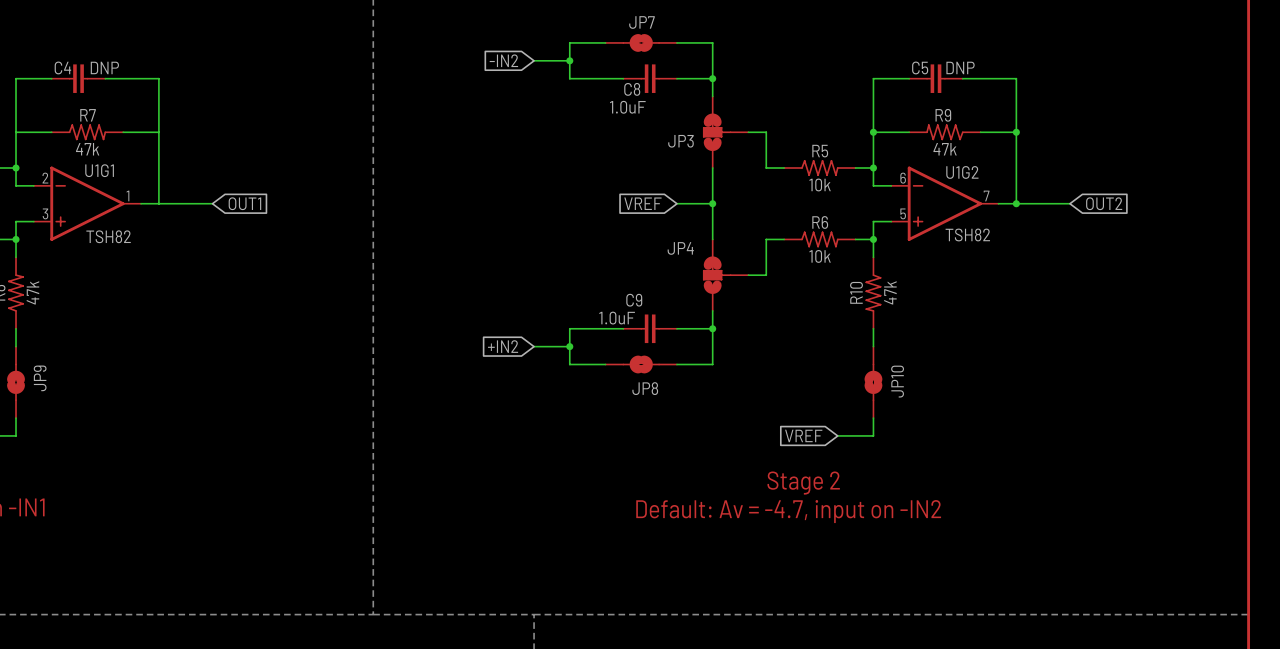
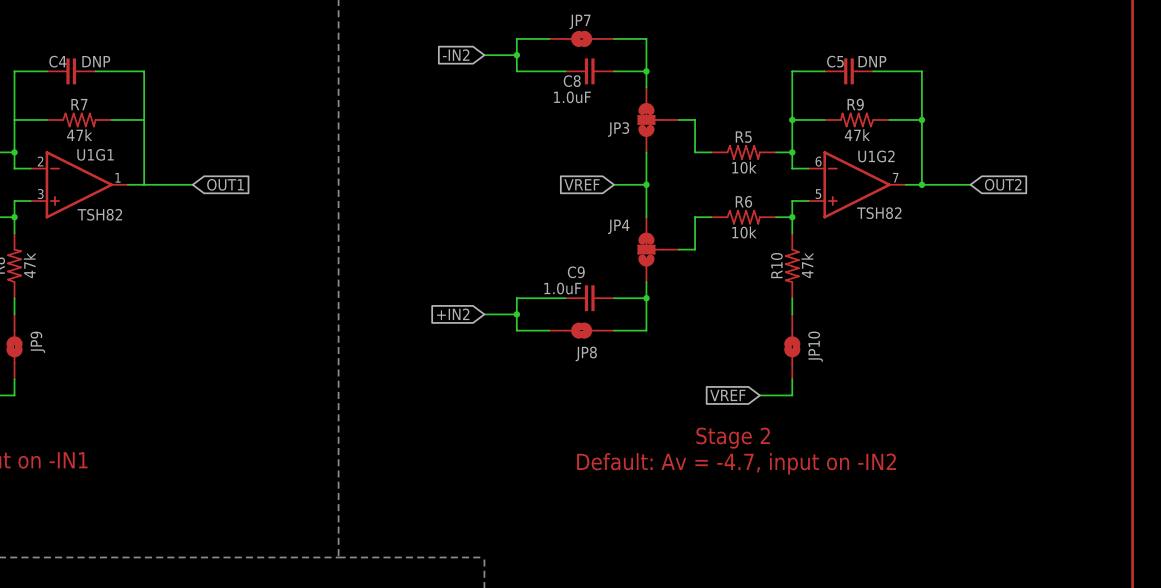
line: (534, 614) (1248, 614) -> none

